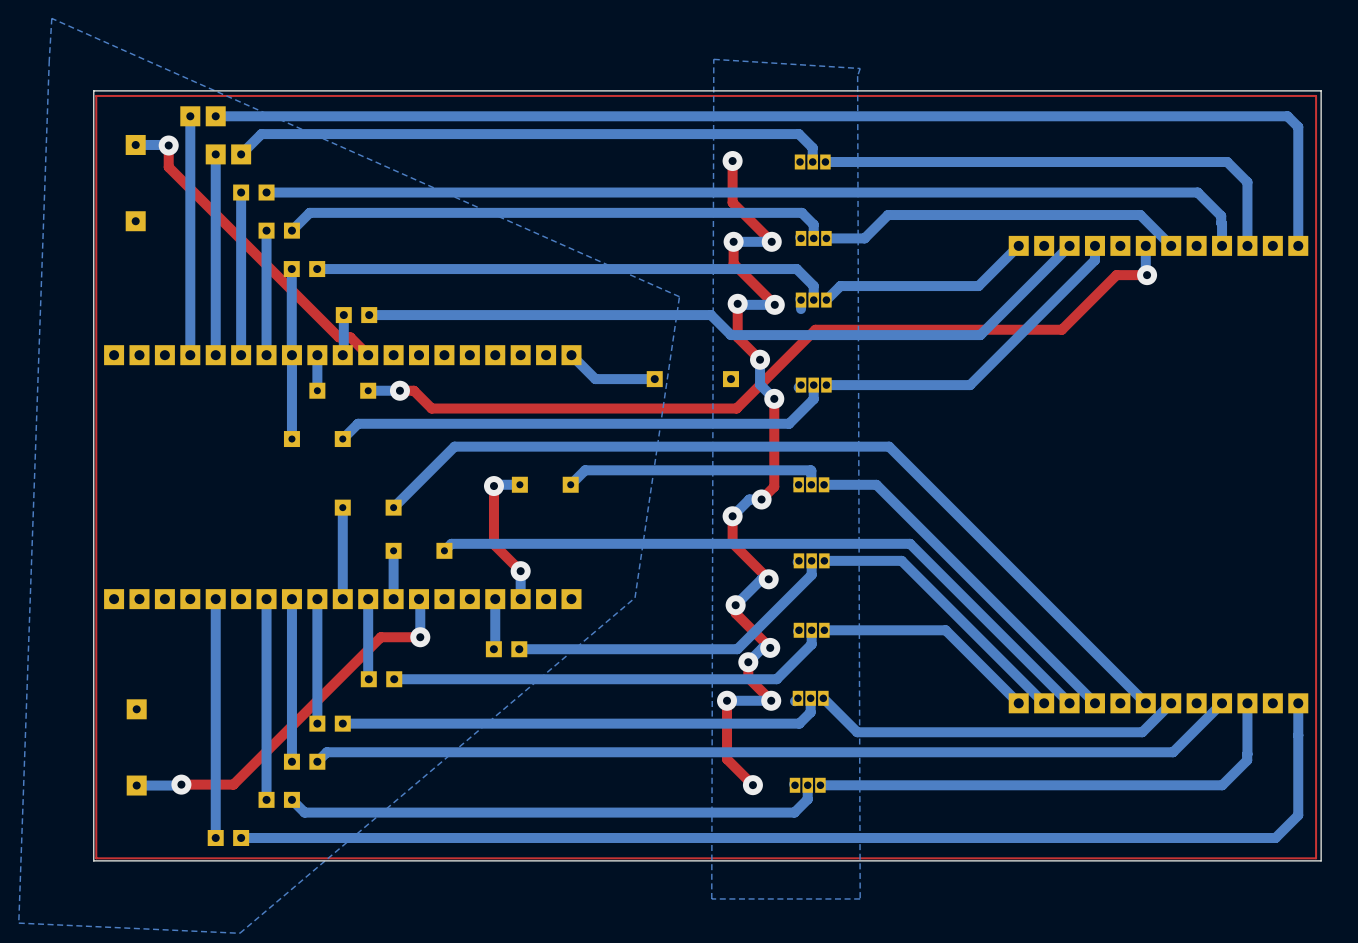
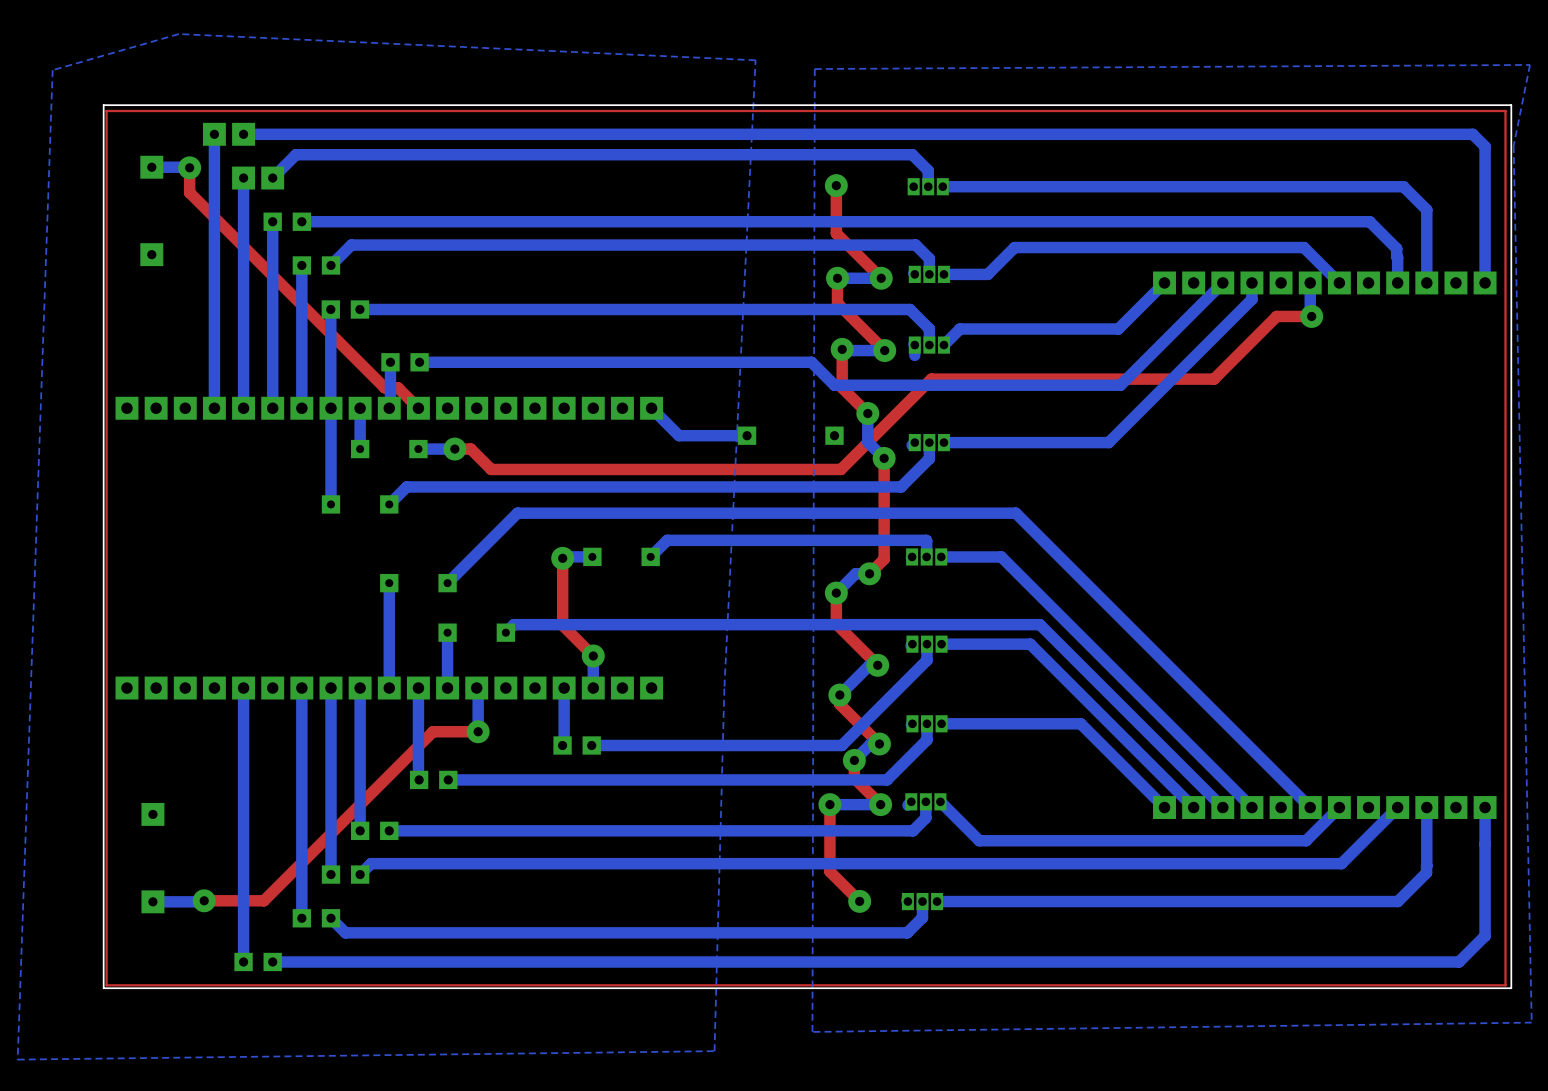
bottom zone outline: (713, 59) (860, 68) (857, 76) (860, 898) (711, 898) -> (814, 69) (1529, 64) (1513, 145) (1531, 1022) (812, 1031)
bottom zone outline: (49, 60) (51, 18) (679, 296) (635, 597) (239, 933) (18, 923) -> (52, 70) (178, 34) (755, 60) (724, 686) (714, 1051) (17, 1059)

